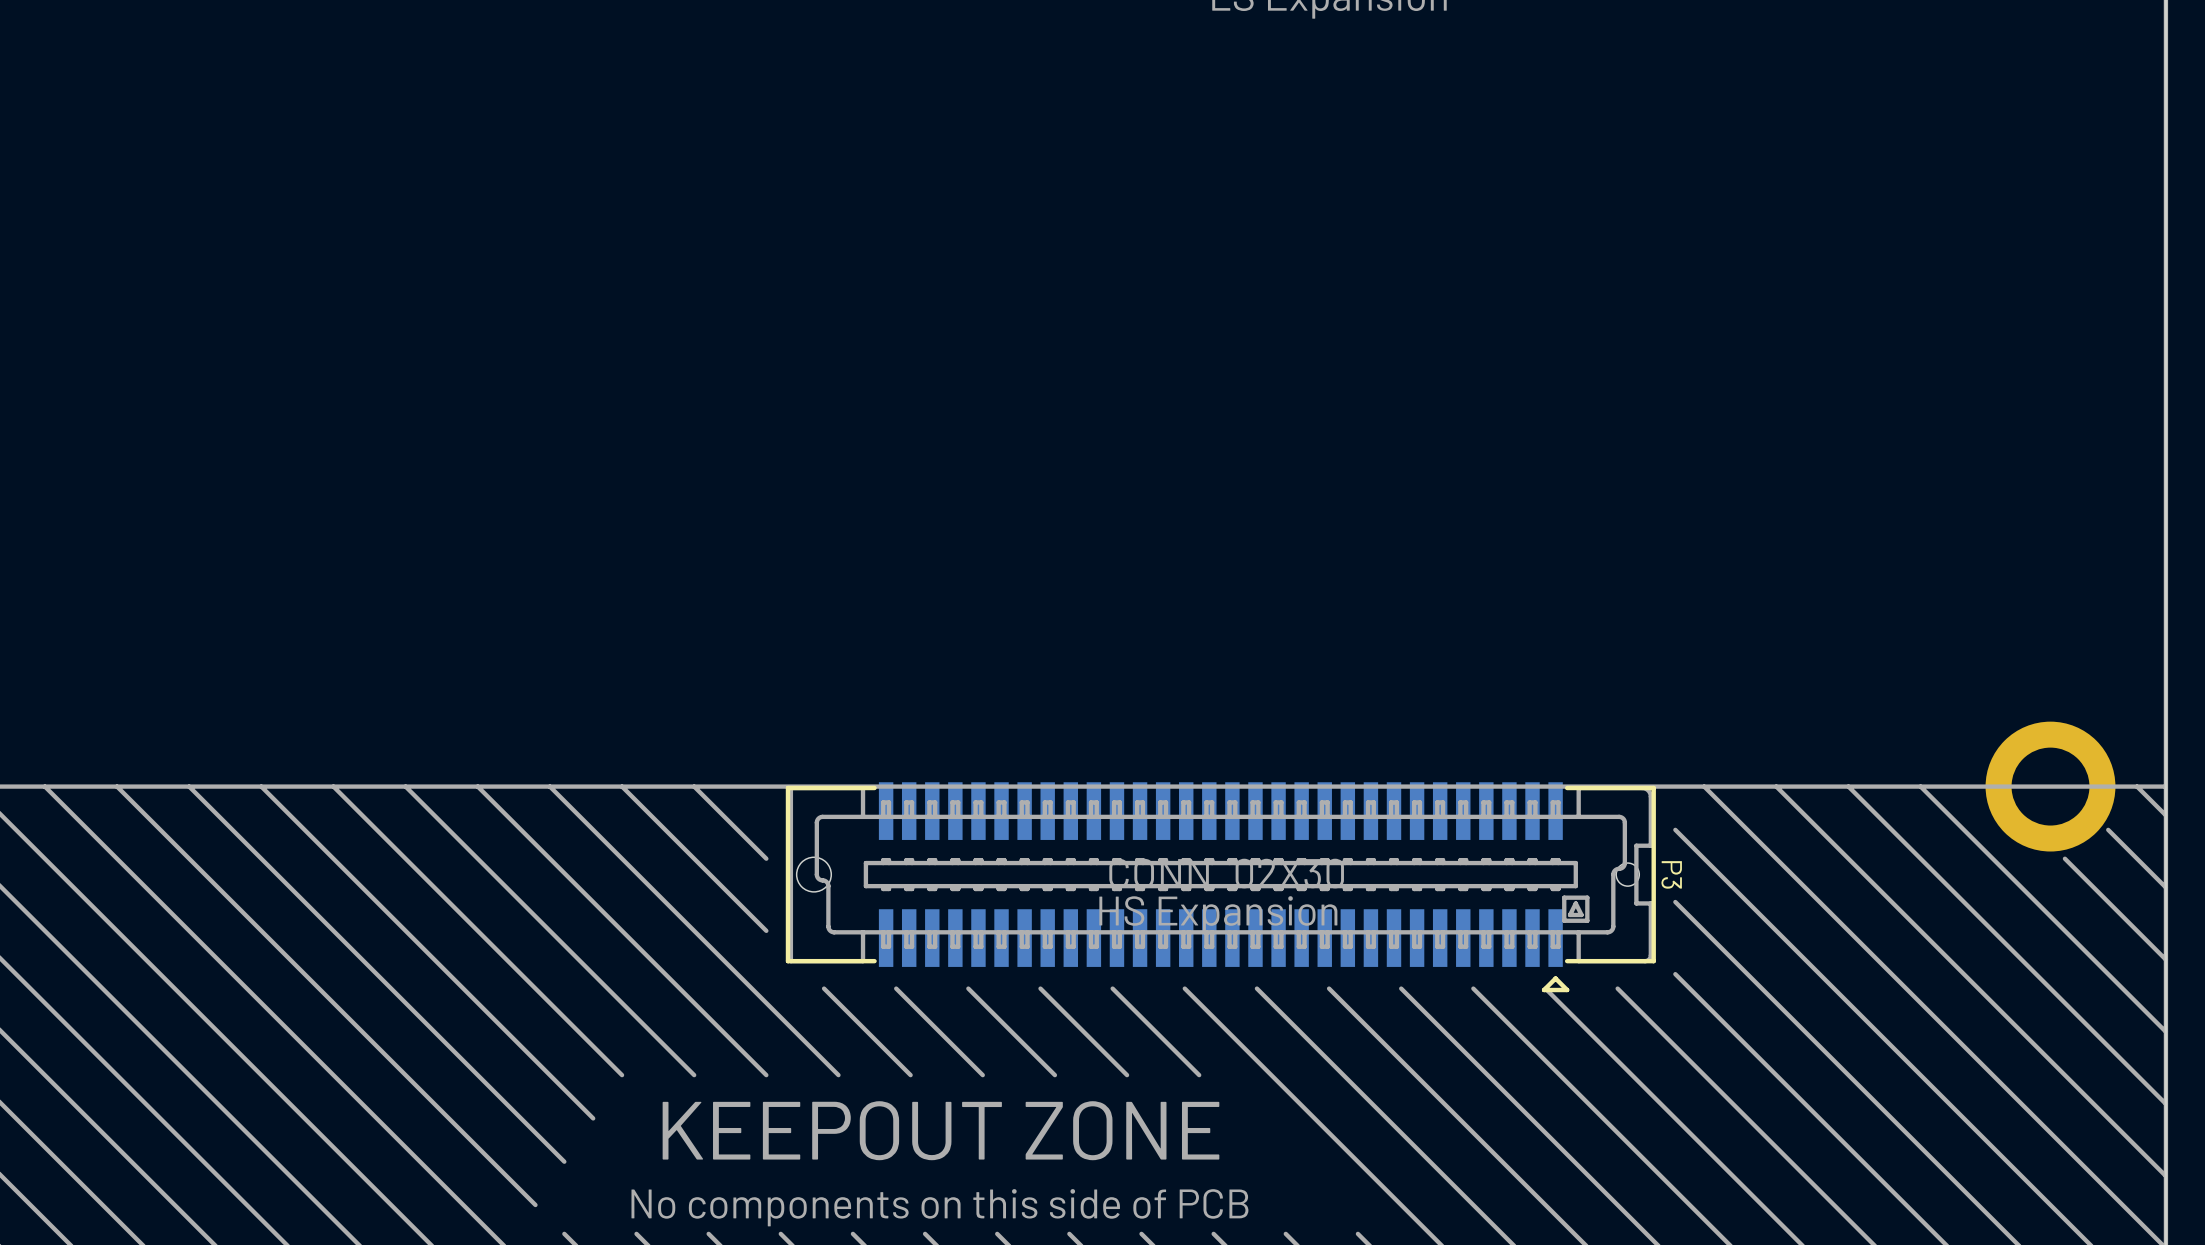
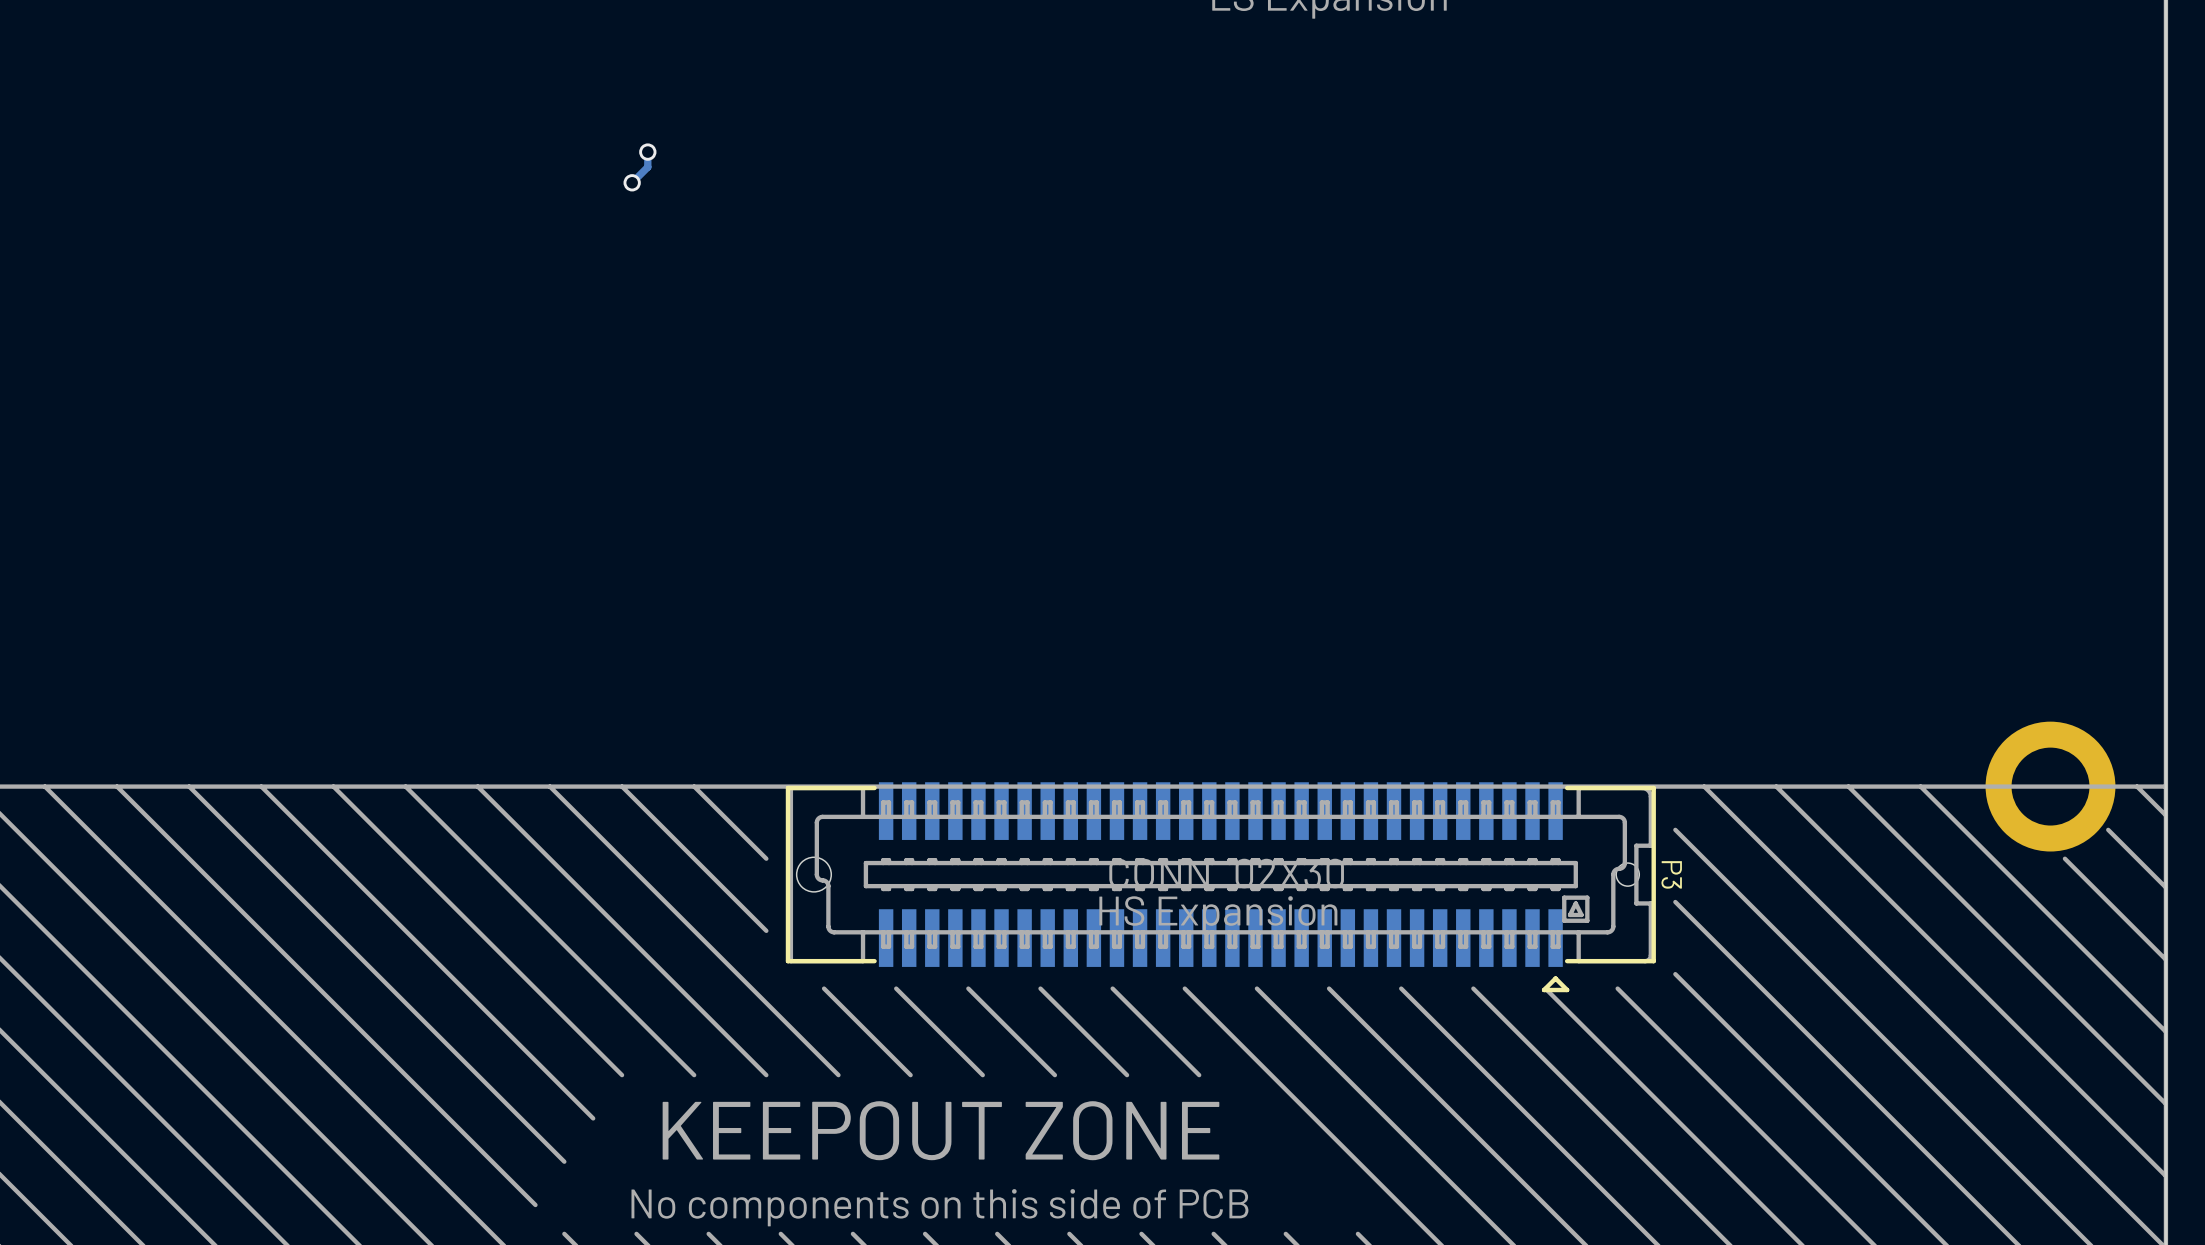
track: none -> (647, 152) (647, 167) (632, 182)
via: none -> (647, 152)
via: none -> (632, 182)

